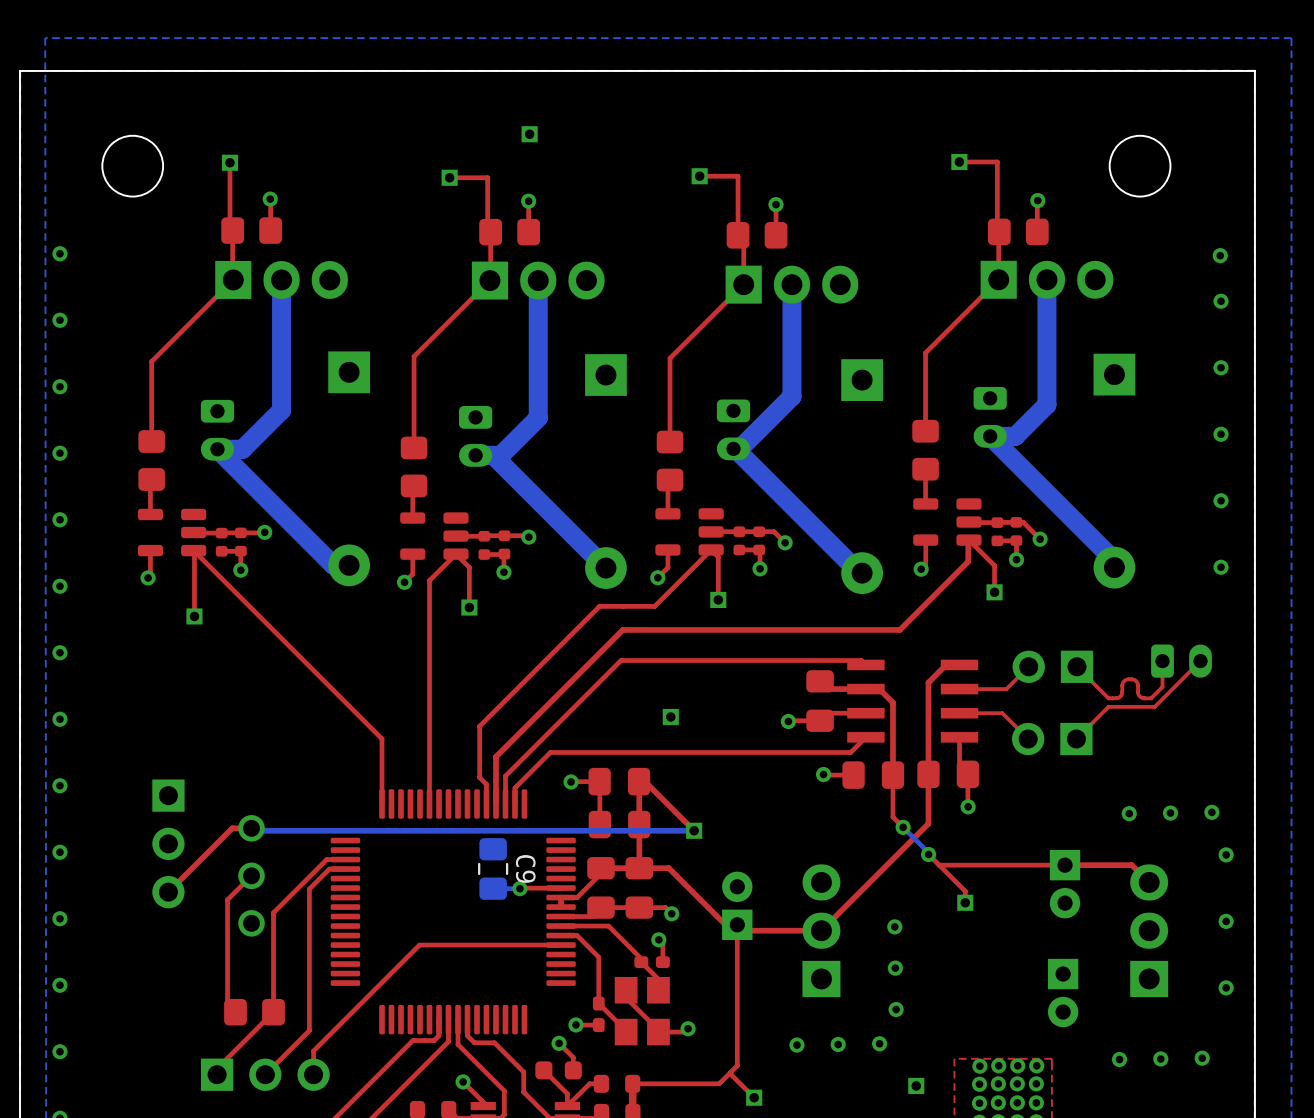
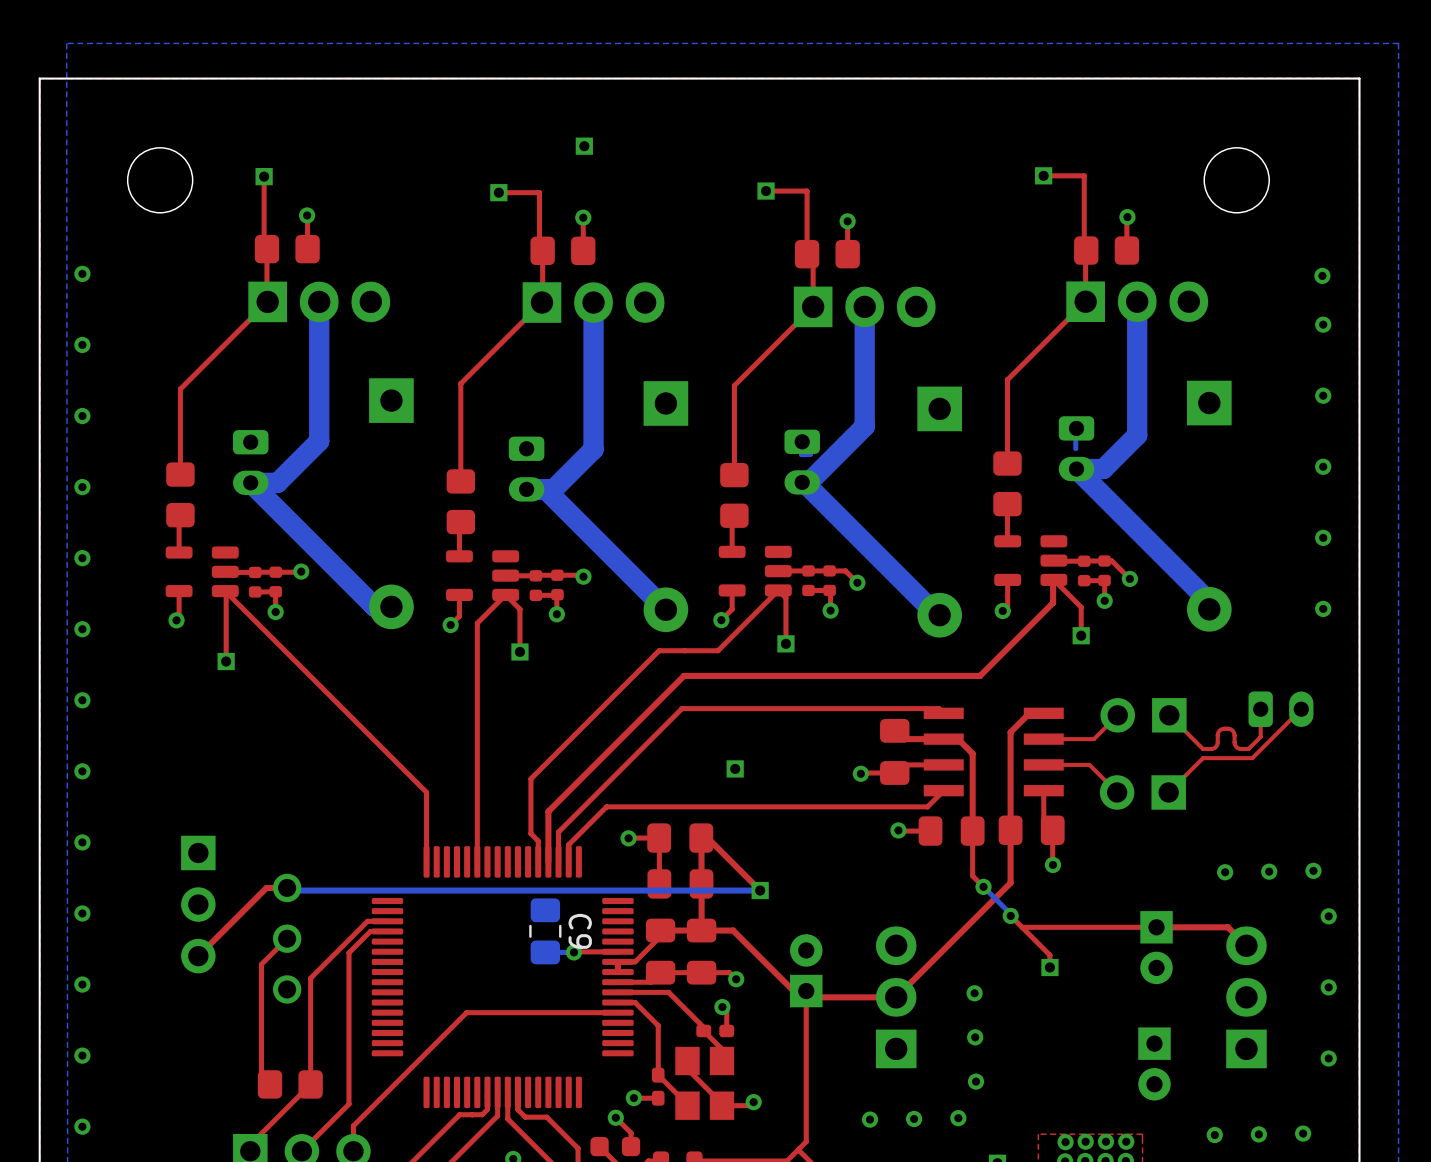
bottom track: none -> (1075, 441) (1075, 448)
bottom track: none -> (810, 454) (801, 454)

